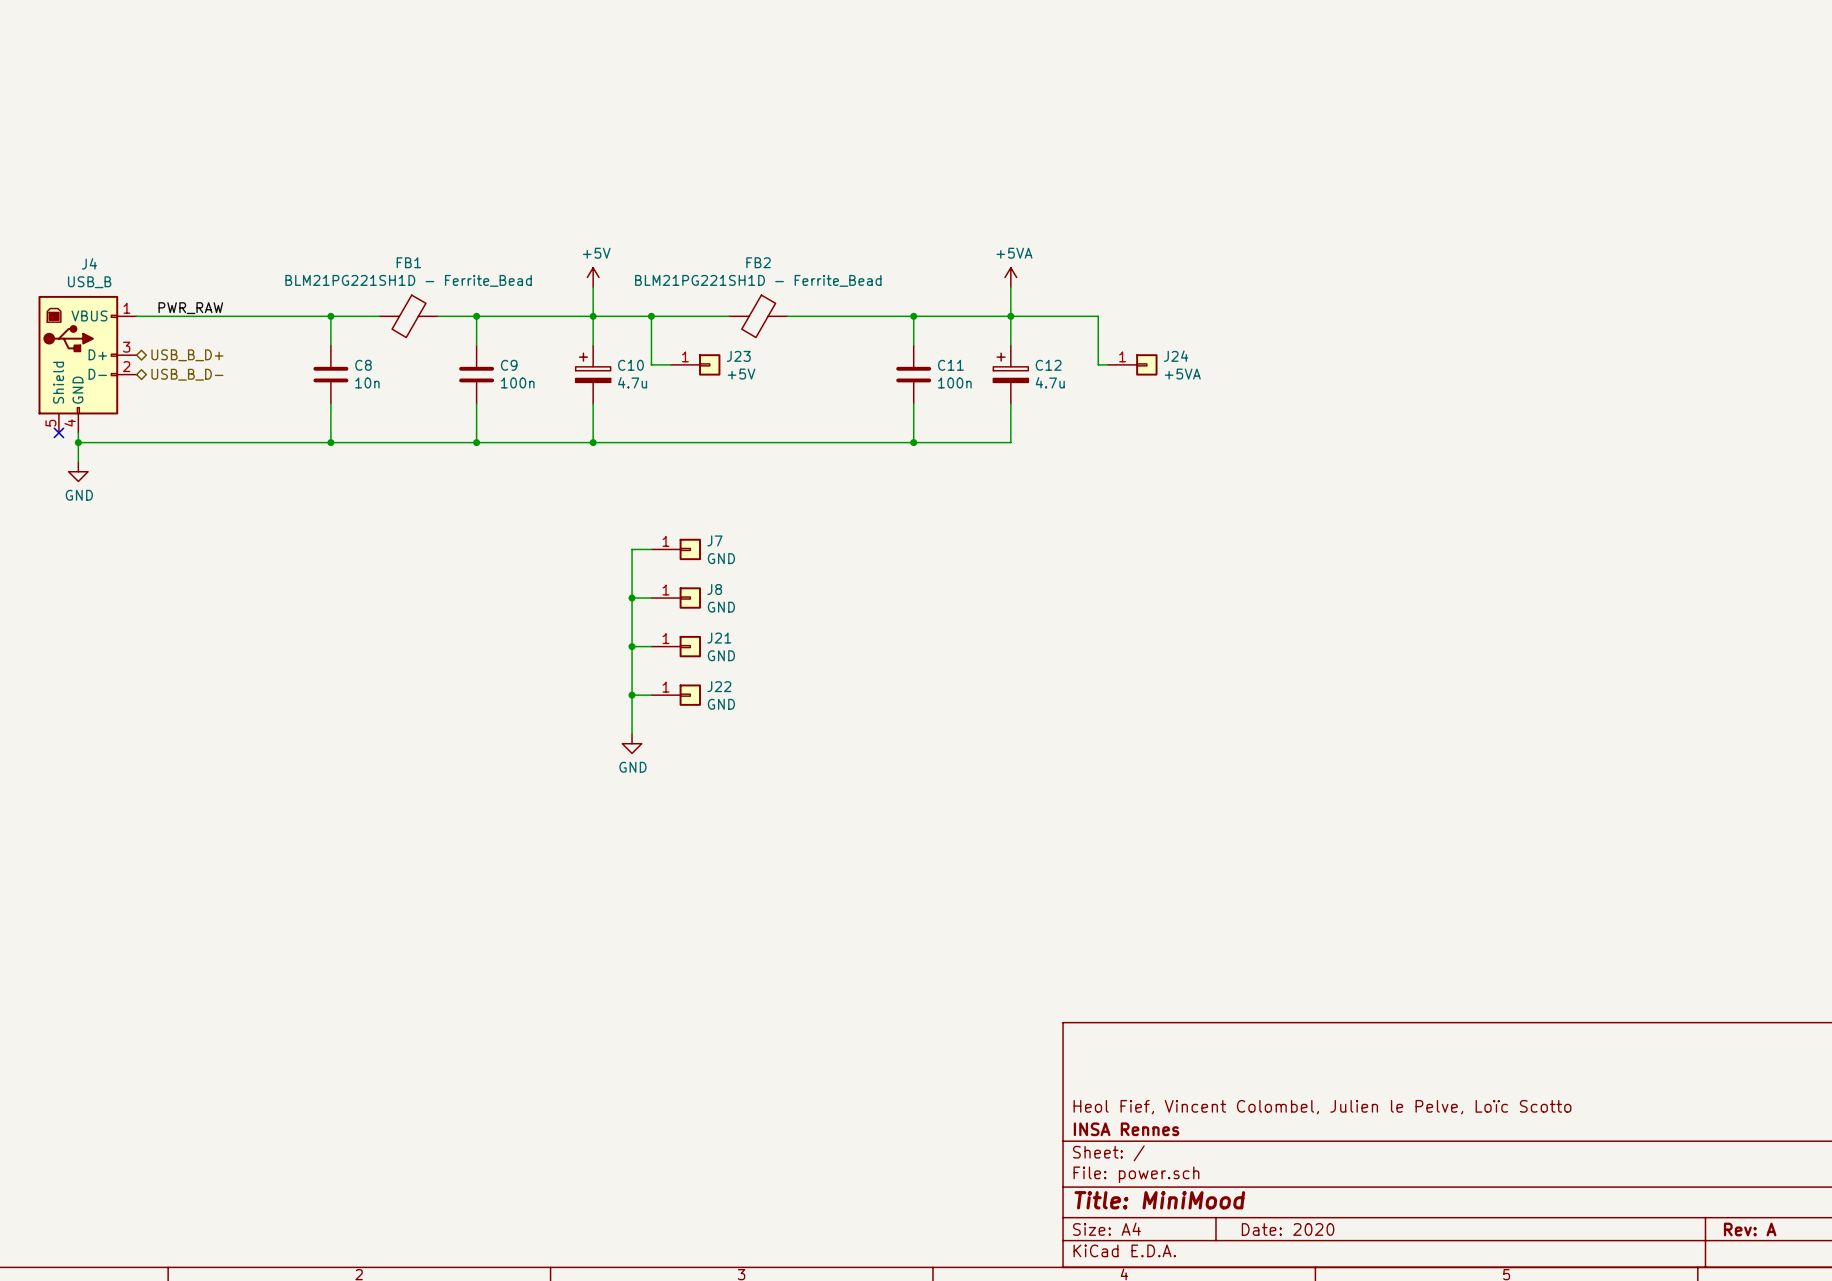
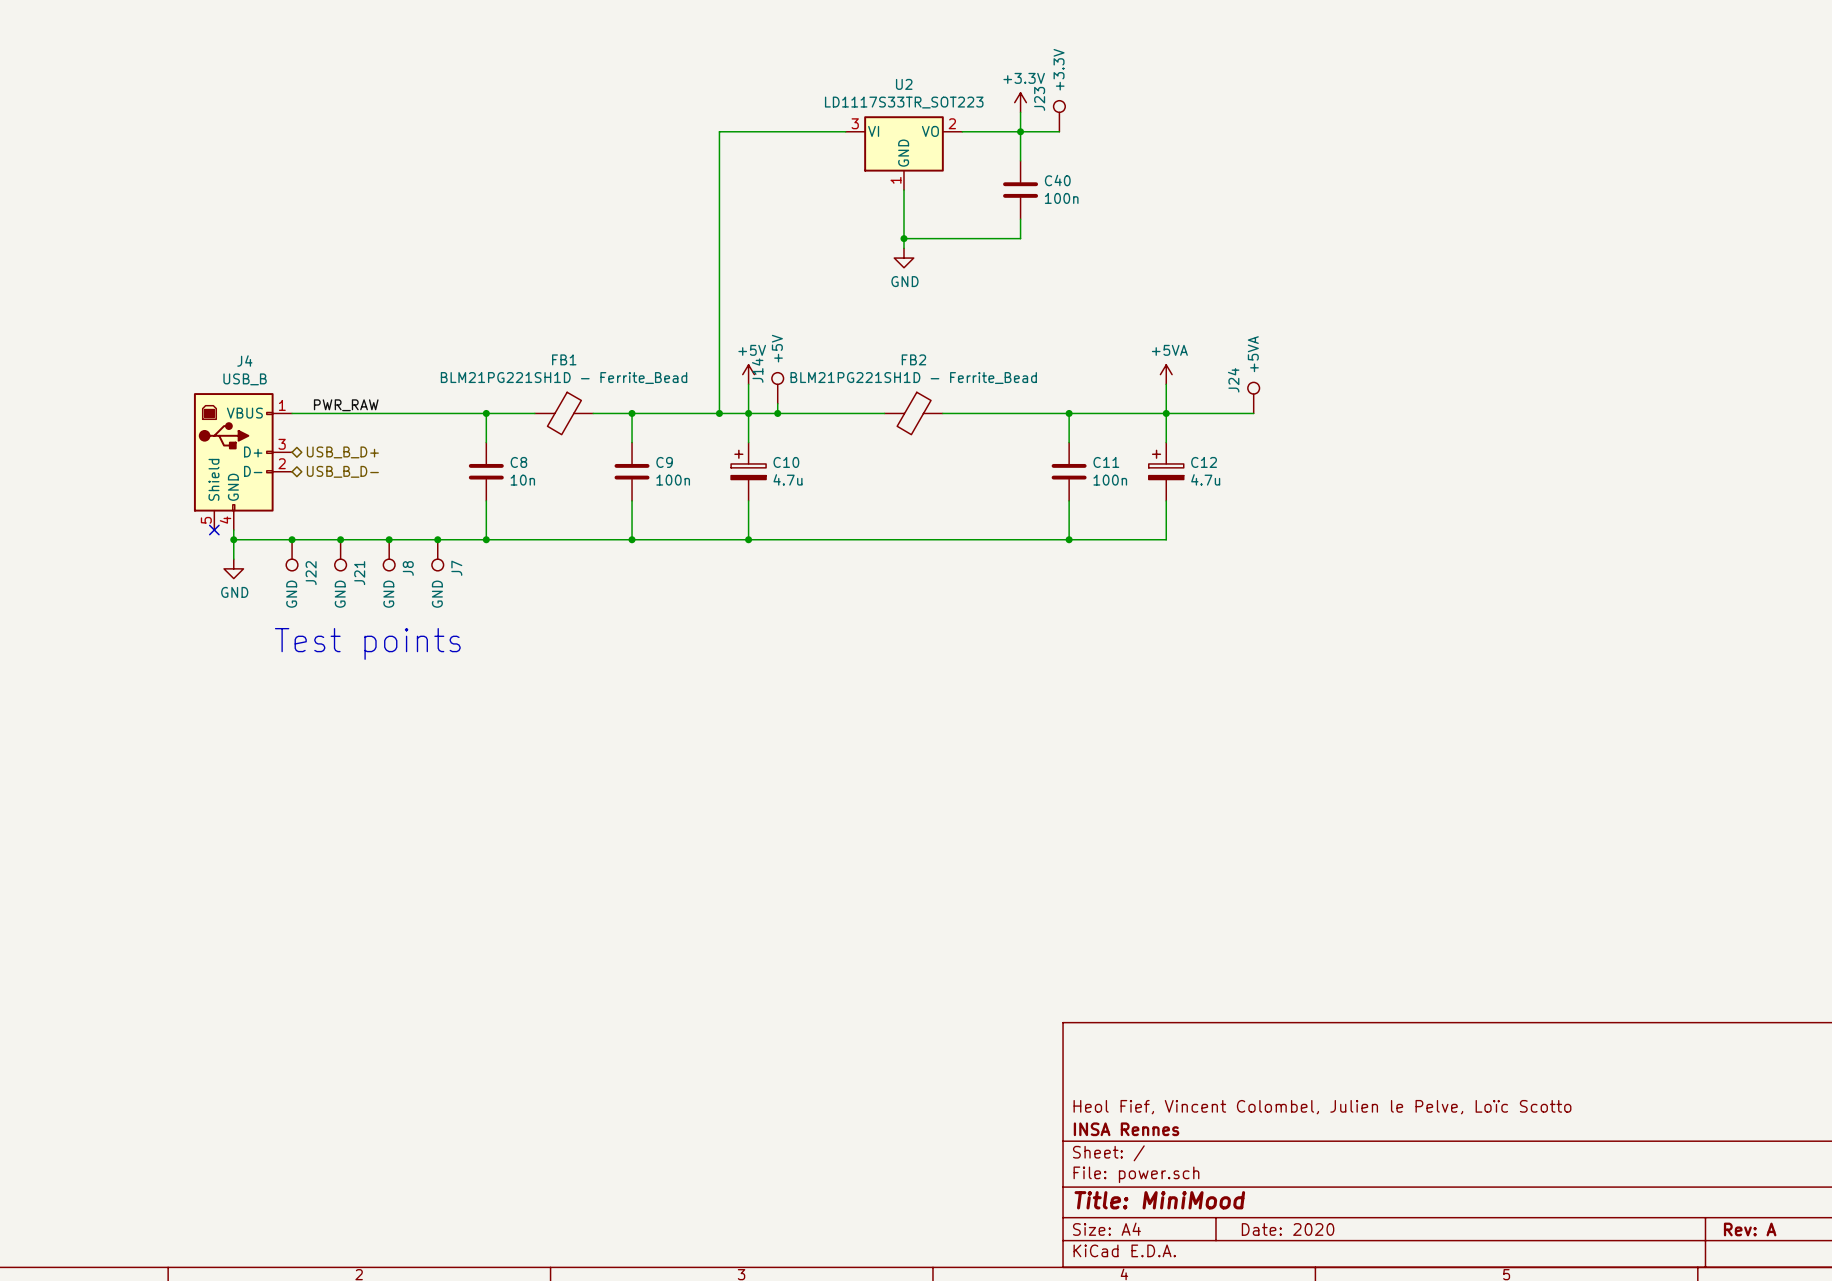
power symbol: none -> +3.3V (1020, 102)
wire: none -> (1020, 112) (1020, 160)
wire: none -> (845, 131) (719, 131) (719, 413)
wire: none -> (962, 131) (1059, 131)
junction: none -> (1020, 131)
U2: none -> LD1117S33TR_SOT223 (903, 153)
wire: none -> (903, 190) (903, 248)
C40: none -> 100n (1020, 190)
wire: none -> (1020, 219) (1020, 238) (903, 238)
junction: none -> (903, 238)
power symbol: none -> GND (903, 258)
power symbol position: +5V (593, 277) -> +5V (748, 374)
power symbol position: +5VA (1010, 277) -> +5VA (1166, 374)
wire: (593, 287) (593, 345) -> (748, 384) (748, 442)
wire: (1010, 287) (1010, 345) -> (1166, 384) (1166, 442)
label position: PWR_RAW (190, 308) -> PWR_RAW (346, 405)
wire: (136, 316) (379, 316) -> (292, 413) (534, 413)
wire: (330, 316) (330, 345) -> (486, 413) (486, 442)
junction: (330, 316) -> none
FB1 position: (408, 316) -> (564, 413)
wire: (437, 316) (729, 316) -> (593, 413) (884, 413)
wire: (476, 316) (476, 345) -> (632, 413) (632, 442)
junction: (476, 316) -> none
junction: (593, 316) -> none
wire: (651, 316) (651, 364) (670, 364) -> none
junction: (651, 316) -> none
FB2 position: (758, 316) -> (913, 413)
wire: (787, 316) (1098, 316) (1098, 364) (1107, 364) -> none
wire: (913, 316) (913, 345) -> (1069, 413) (1069, 442)
junction: (913, 316) -> none
junction: (1010, 316) -> none
J23 symbol: [670, 354, 721, 376] -> [1053, 100, 1066, 132]
J24 symbol: [1107, 354, 1158, 376] -> [1247, 382, 1260, 414]
hierarchical label position: USB_B_D+ (187, 355) -> USB_B_D+ (342, 452)
J23 name position: J23 (738, 356) -> J23 (1039, 98)
J24 name position: J24 (1176, 356) -> J24 (1233, 380)
J4 position: (87, 364) -> (242, 461)
hierarchical label position: USB_B_D- (187, 374) -> USB_B_D- (342, 471)
C8 position: (330, 374) -> (486, 471)
C9 position: (476, 374) -> (632, 471)
C10 position: (593, 374) -> (748, 471)
J23 value: +5V (741, 374) -> +3.3V (1059, 69)
C11 position: (913, 374) -> (1069, 471)
C12 position: (1010, 374) -> (1166, 471)
J24 value position: +5VA (1182, 374) -> +5VA (1253, 354)
J14: none -> +5V (777, 388)
wire: (330, 403) (330, 442) -> (486, 500) (486, 539)
wire: (476, 403) (476, 442) -> (632, 500) (632, 539)
wire: (593, 403) (593, 442) -> (748, 500) (748, 539)
wire: none -> (777, 403) (777, 413)
wire: (913, 403) (913, 442) -> (1069, 500) (1069, 539)
wire: (1010, 403) (1010, 442) (78, 442) -> (1166, 500) (1166, 539) (233, 539)
junction: none -> (632, 413)
junction: none -> (719, 413)
junction: none -> (748, 413)
junction: none -> (777, 413)
wire: none -> (942, 413) (1253, 413)
junction: none -> (1069, 413)
junction: none -> (1166, 413)
no-connect mark: (58, 432) -> none
wire: (78, 432) (78, 462) -> (233, 530) (233, 559)
junction: (78, 442) -> none
junction: (330, 442) -> none
junction position: (476, 442) -> (486, 413)
junction: (593, 442) -> none
junction: (913, 442) -> none
power symbol position: GND (78, 471) -> GND (233, 568)
no-connect mark: none -> (214, 530)
J7 symbol: [651, 538, 701, 561] -> [431, 539, 444, 571]
junction: none -> (233, 539)
junction: none -> (292, 539)
junction: none -> (340, 539)
junction: none -> (389, 539)
junction: none -> (437, 539)
junction: none -> (486, 539)
junction: none -> (632, 539)
junction: none -> (748, 539)
junction: none -> (1069, 539)
J7 name position: J7 (714, 540) -> J7 (456, 568)
wire: (651, 549) (632, 549) (632, 734) -> none
J7 value position: GND (721, 558) -> GND (437, 594)
J8 symbol: [651, 587, 701, 609] -> [383, 539, 396, 571]
J8 name position: J8 (714, 589) -> J8 (408, 568)
wire: (632, 598) (651, 598) -> none
junction: (632, 598) -> none
J8 value position: GND (721, 607) -> GND (388, 594)
J21 symbol: [651, 635, 701, 658] -> [334, 539, 347, 571]
J21 name position: J21 (719, 638) -> J21 (359, 573)
text: none -> Test points (367, 643)
wire: (632, 646) (651, 646) -> none
junction: (632, 646) -> none
J21 value position: GND (721, 655) -> GND (340, 594)
J22 symbol: [651, 684, 701, 706] -> [286, 539, 298, 571]
J22 name position: J22 (719, 686) -> J22 (311, 573)
wire: (632, 695) (651, 695) -> none
junction: (632, 695) -> none
J22 value position: GND (721, 704) -> GND (291, 594)
power symbol: GND (632, 743) -> none

